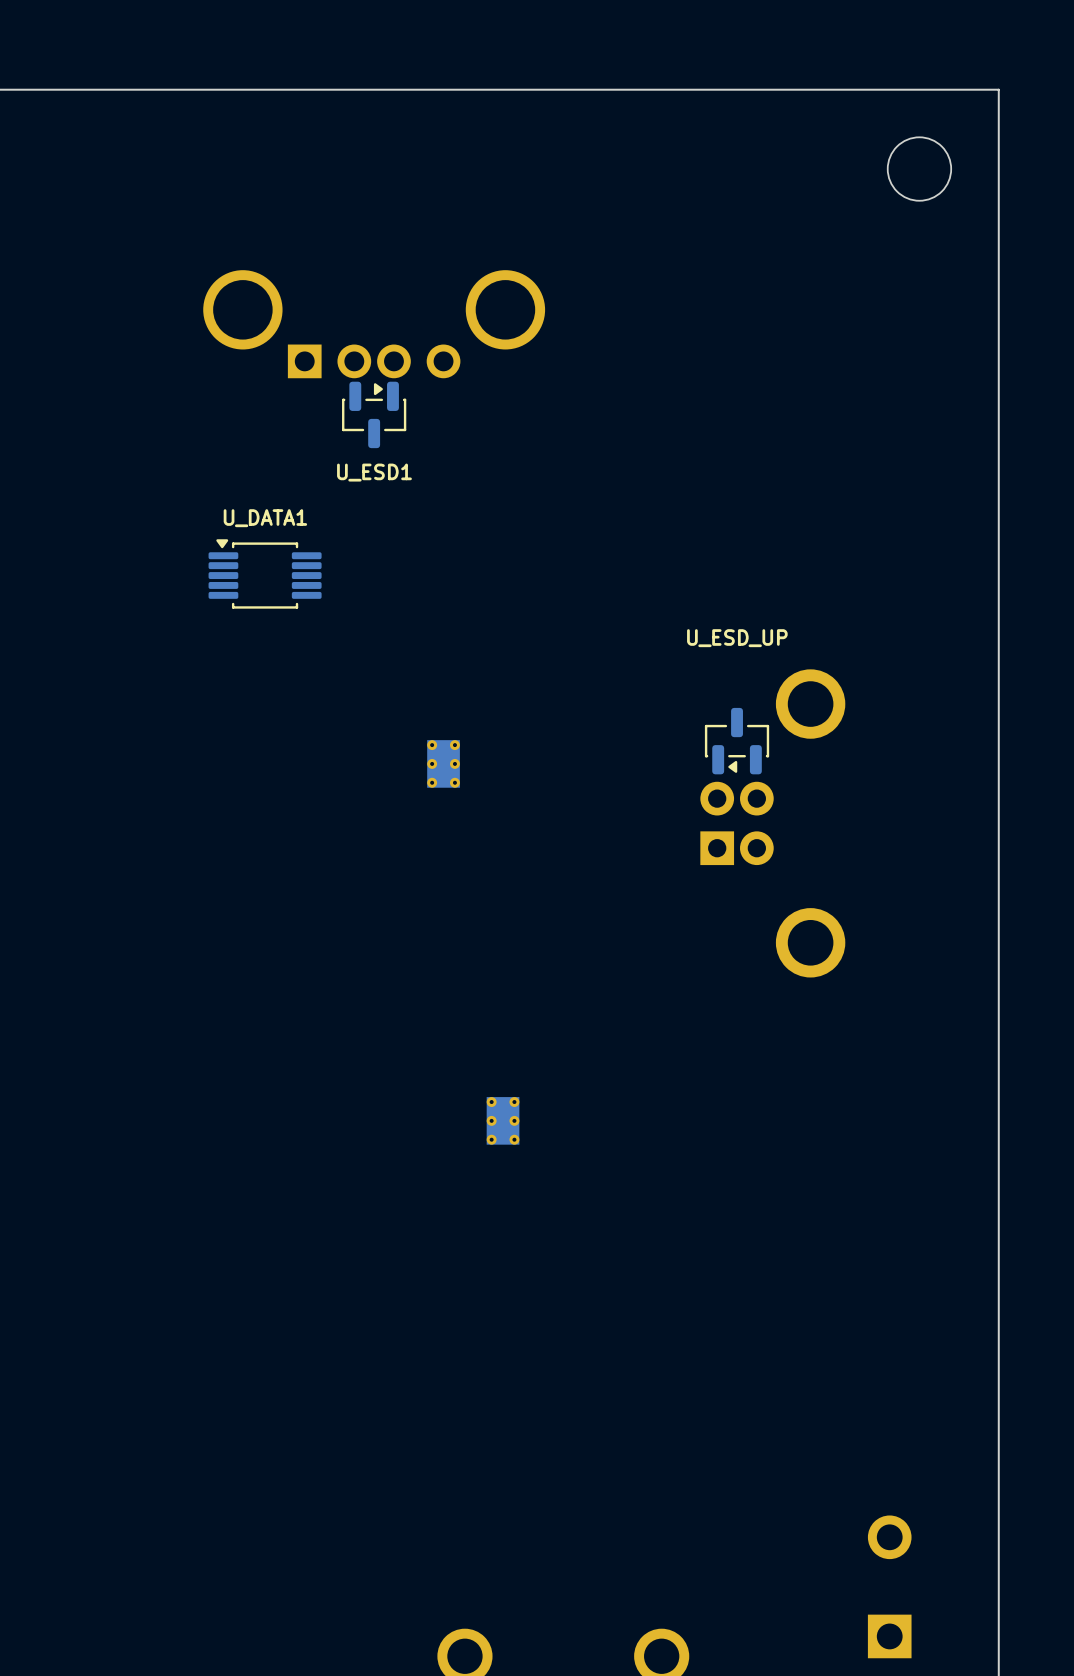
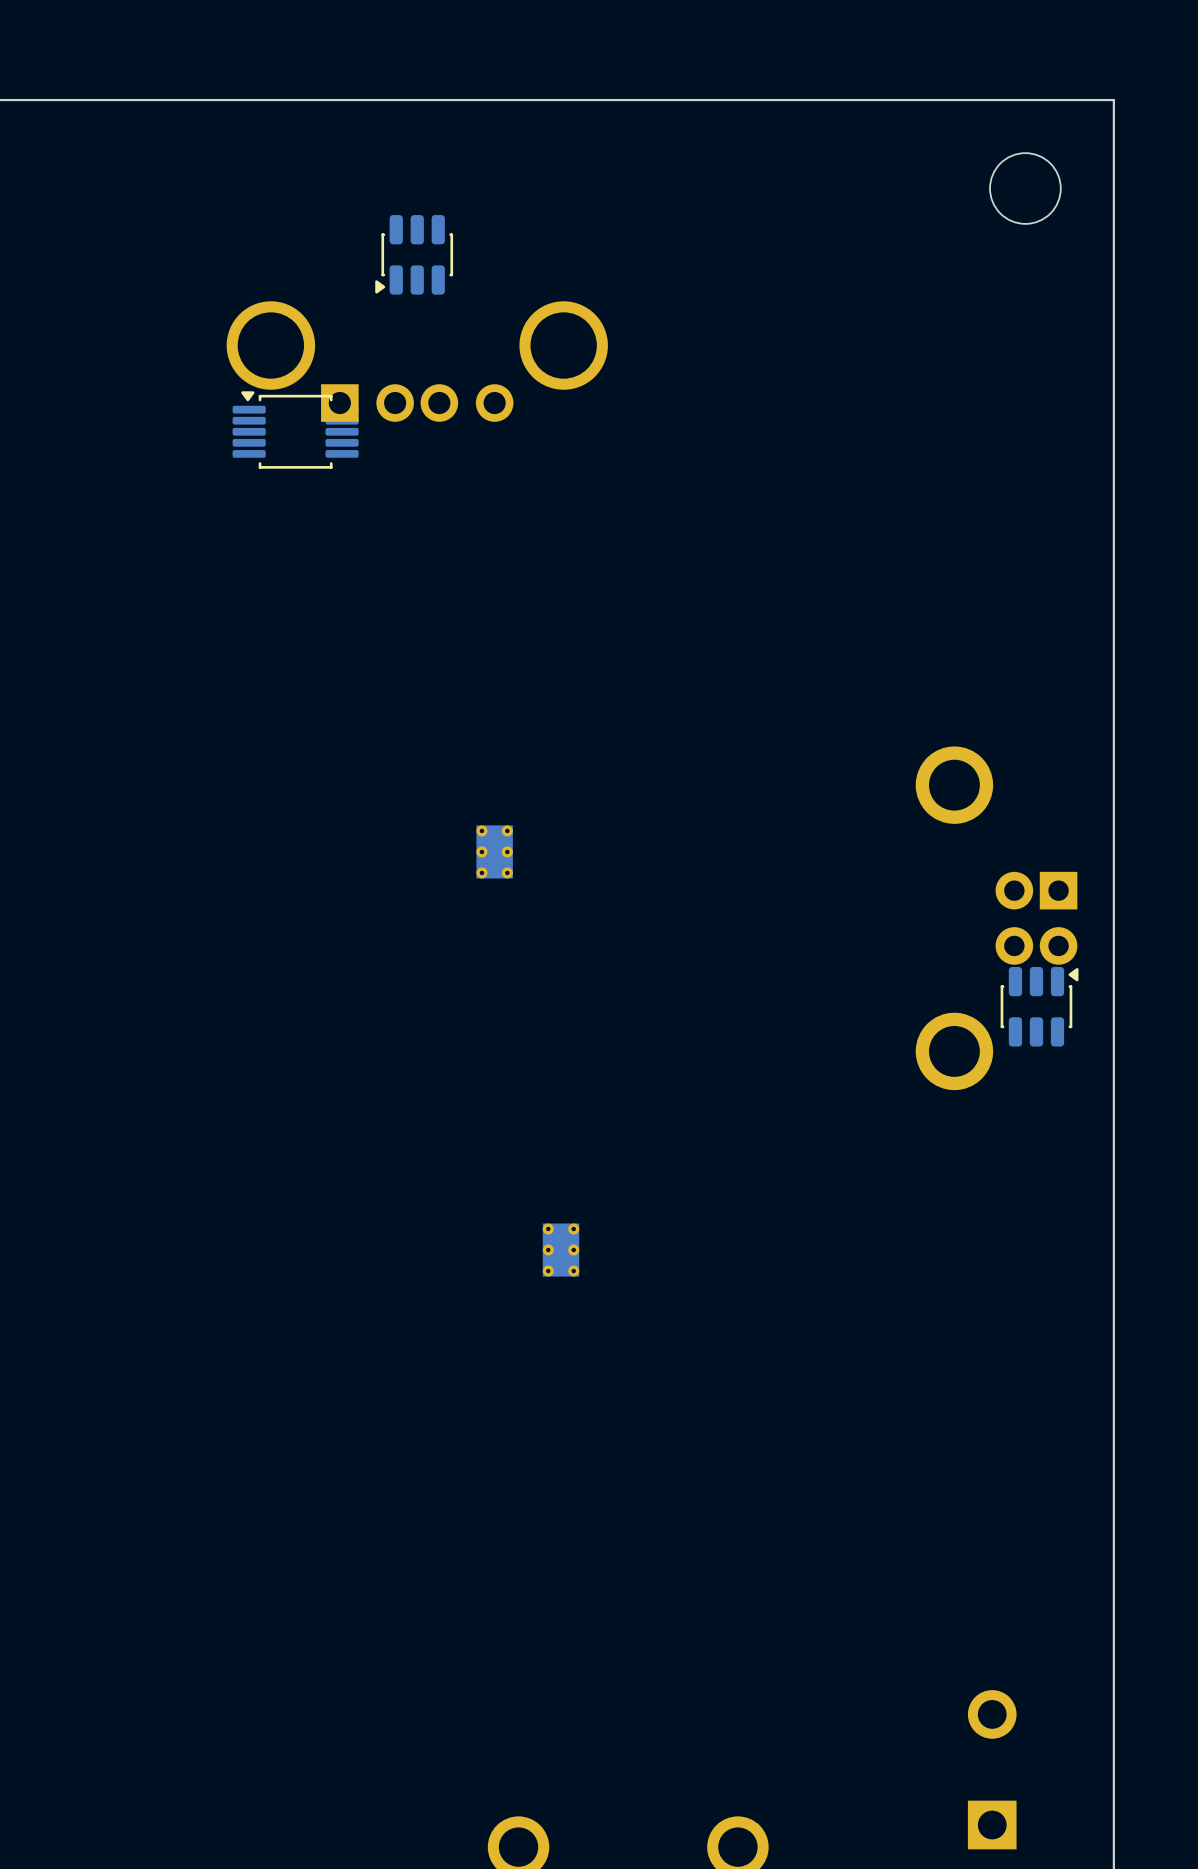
part: none -> (414, 254)
part: none -> (295, 430)
U_ESD1: (374, 414) -> none
U_DATA1: (265, 573) -> none
U_ESD_UP: (737, 741) -> none
part rotation: 0° (772, 823) -> 180° (996, 918)
part: none -> (1039, 1006)

